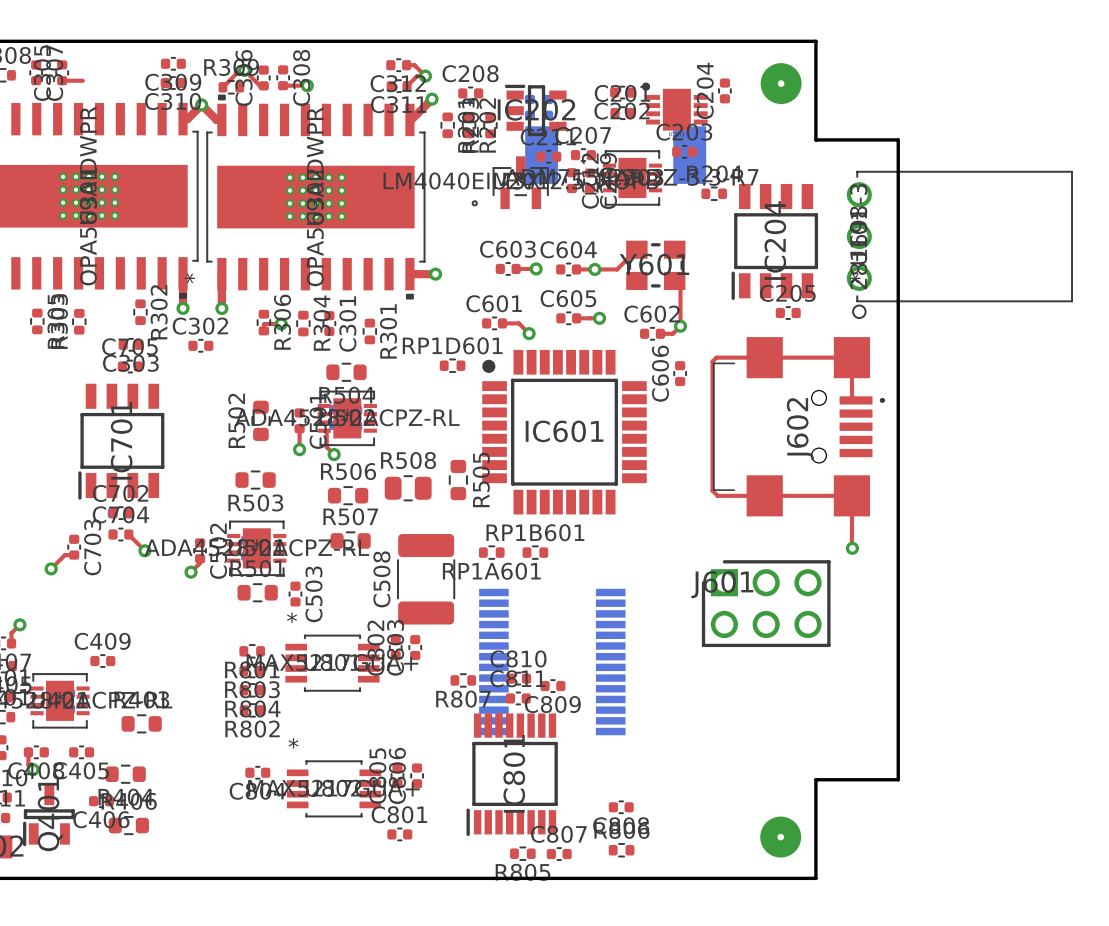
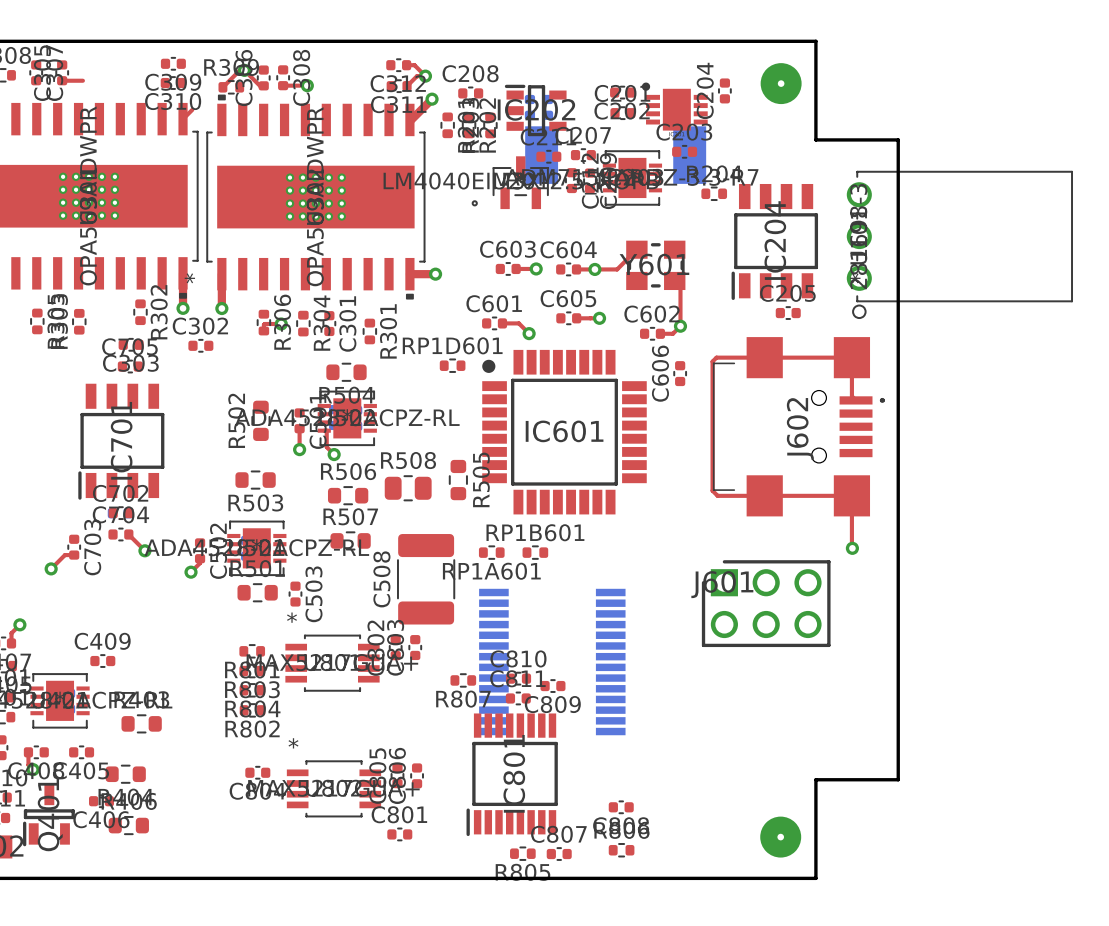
via: (201, 104) -> none
top track: (183, 119) (187, 119) (201, 104) (216, 119) (221, 119) -> (183, 119) (192, 109)

